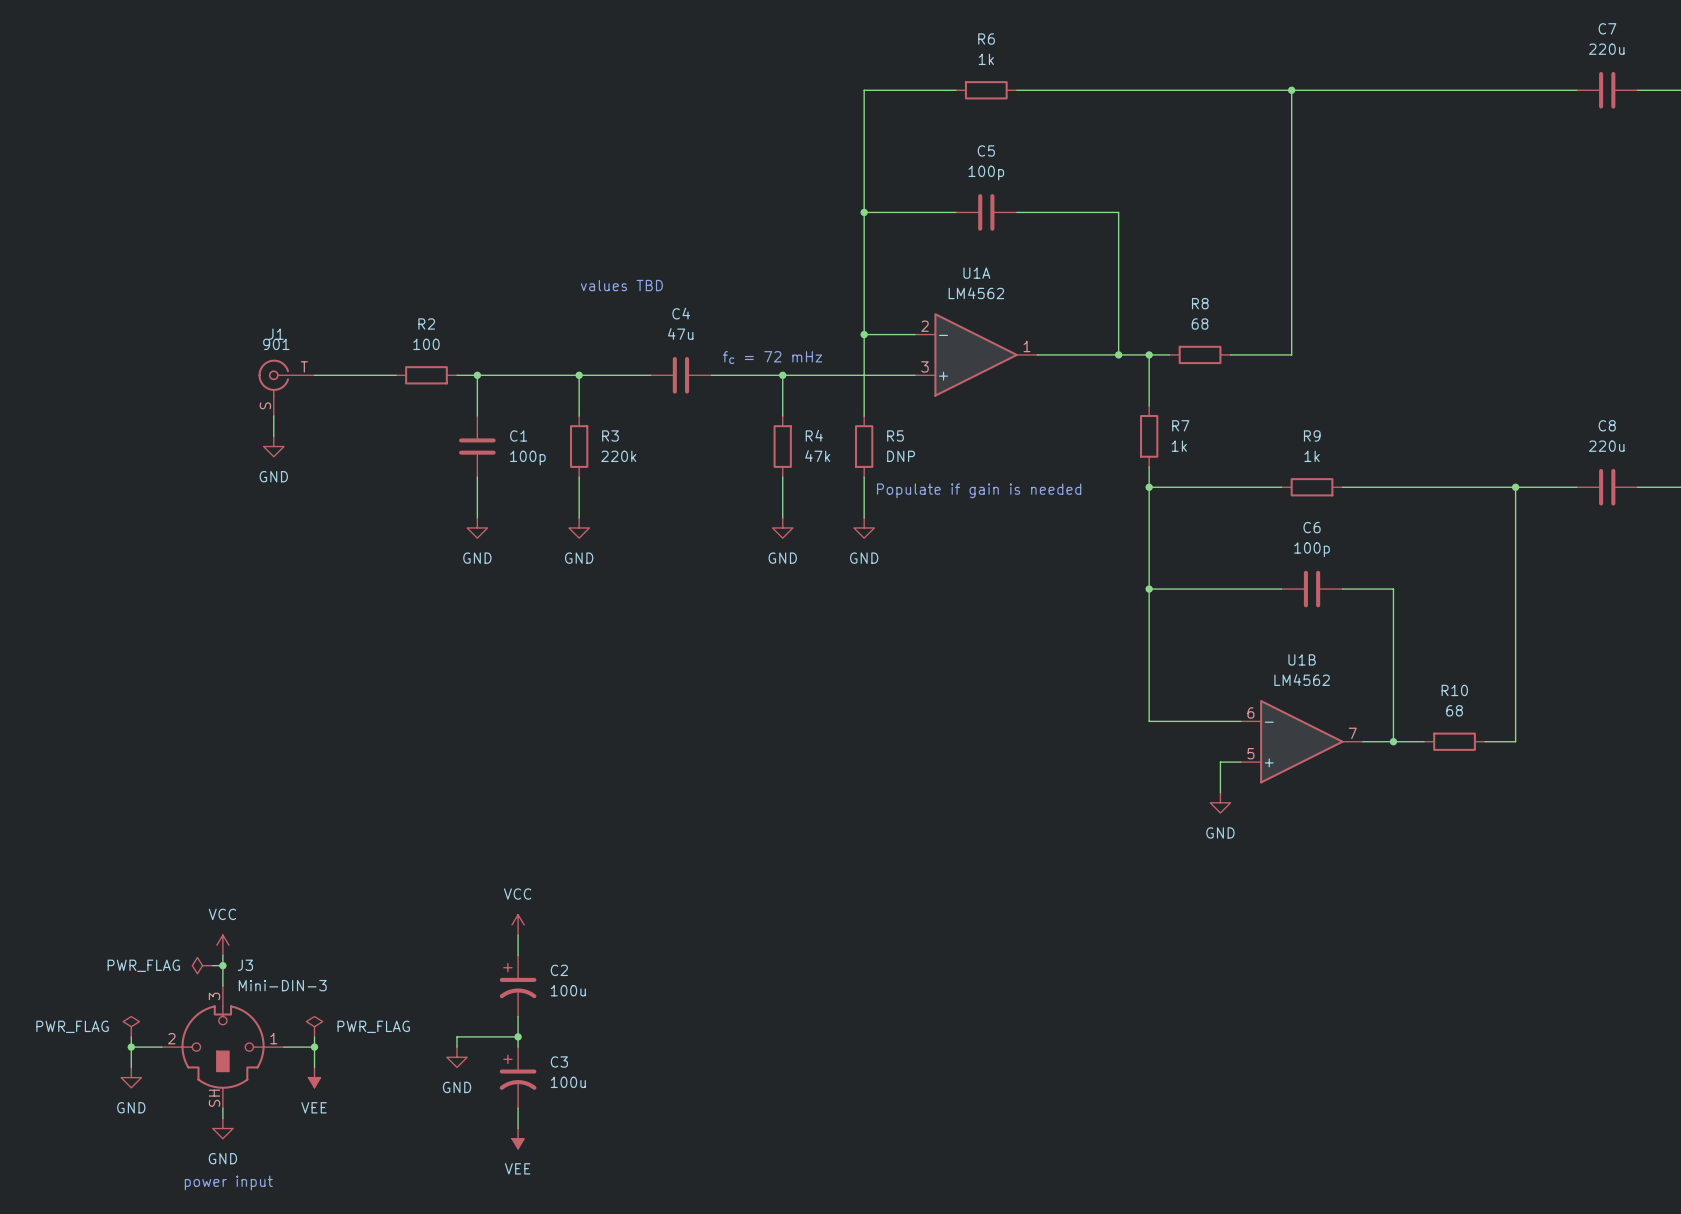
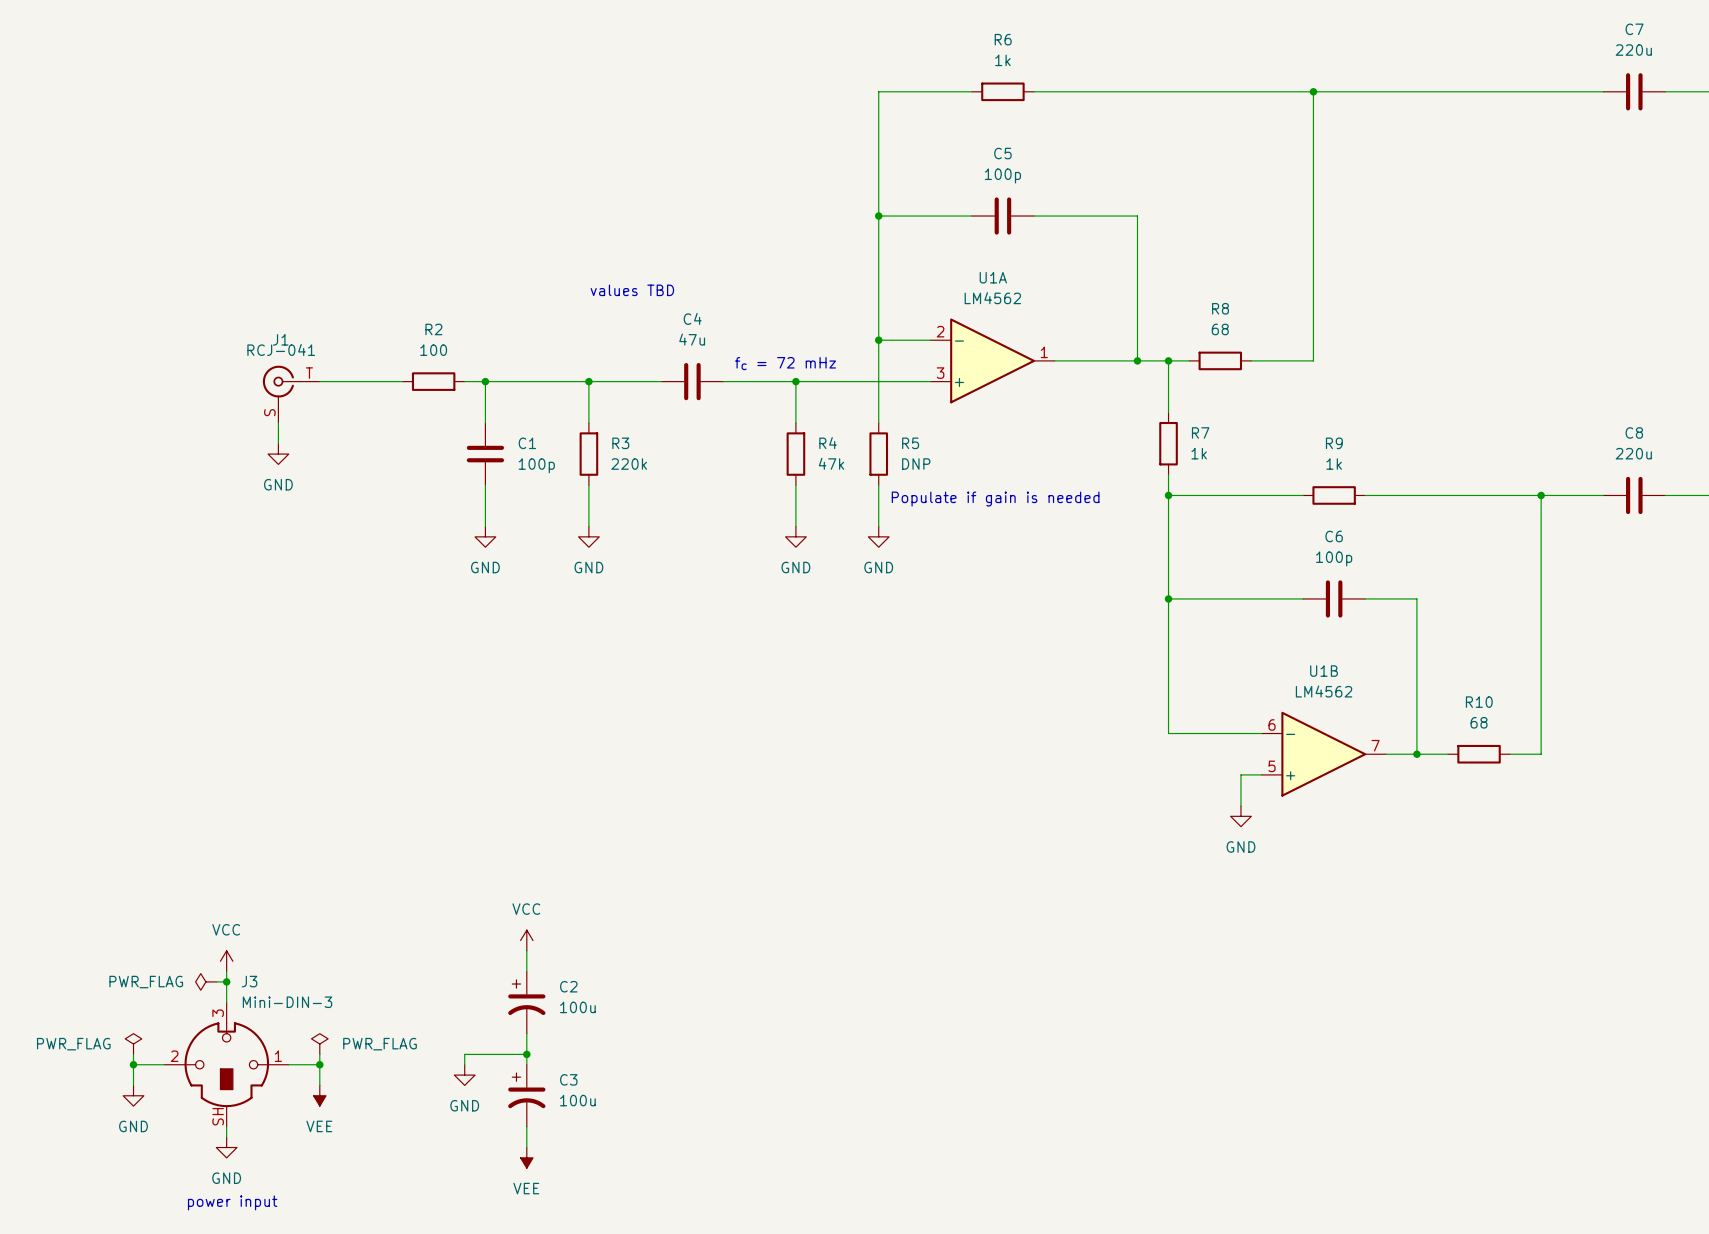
J1 value: 901 (276, 344) -> RCJ-041 (281, 349)

